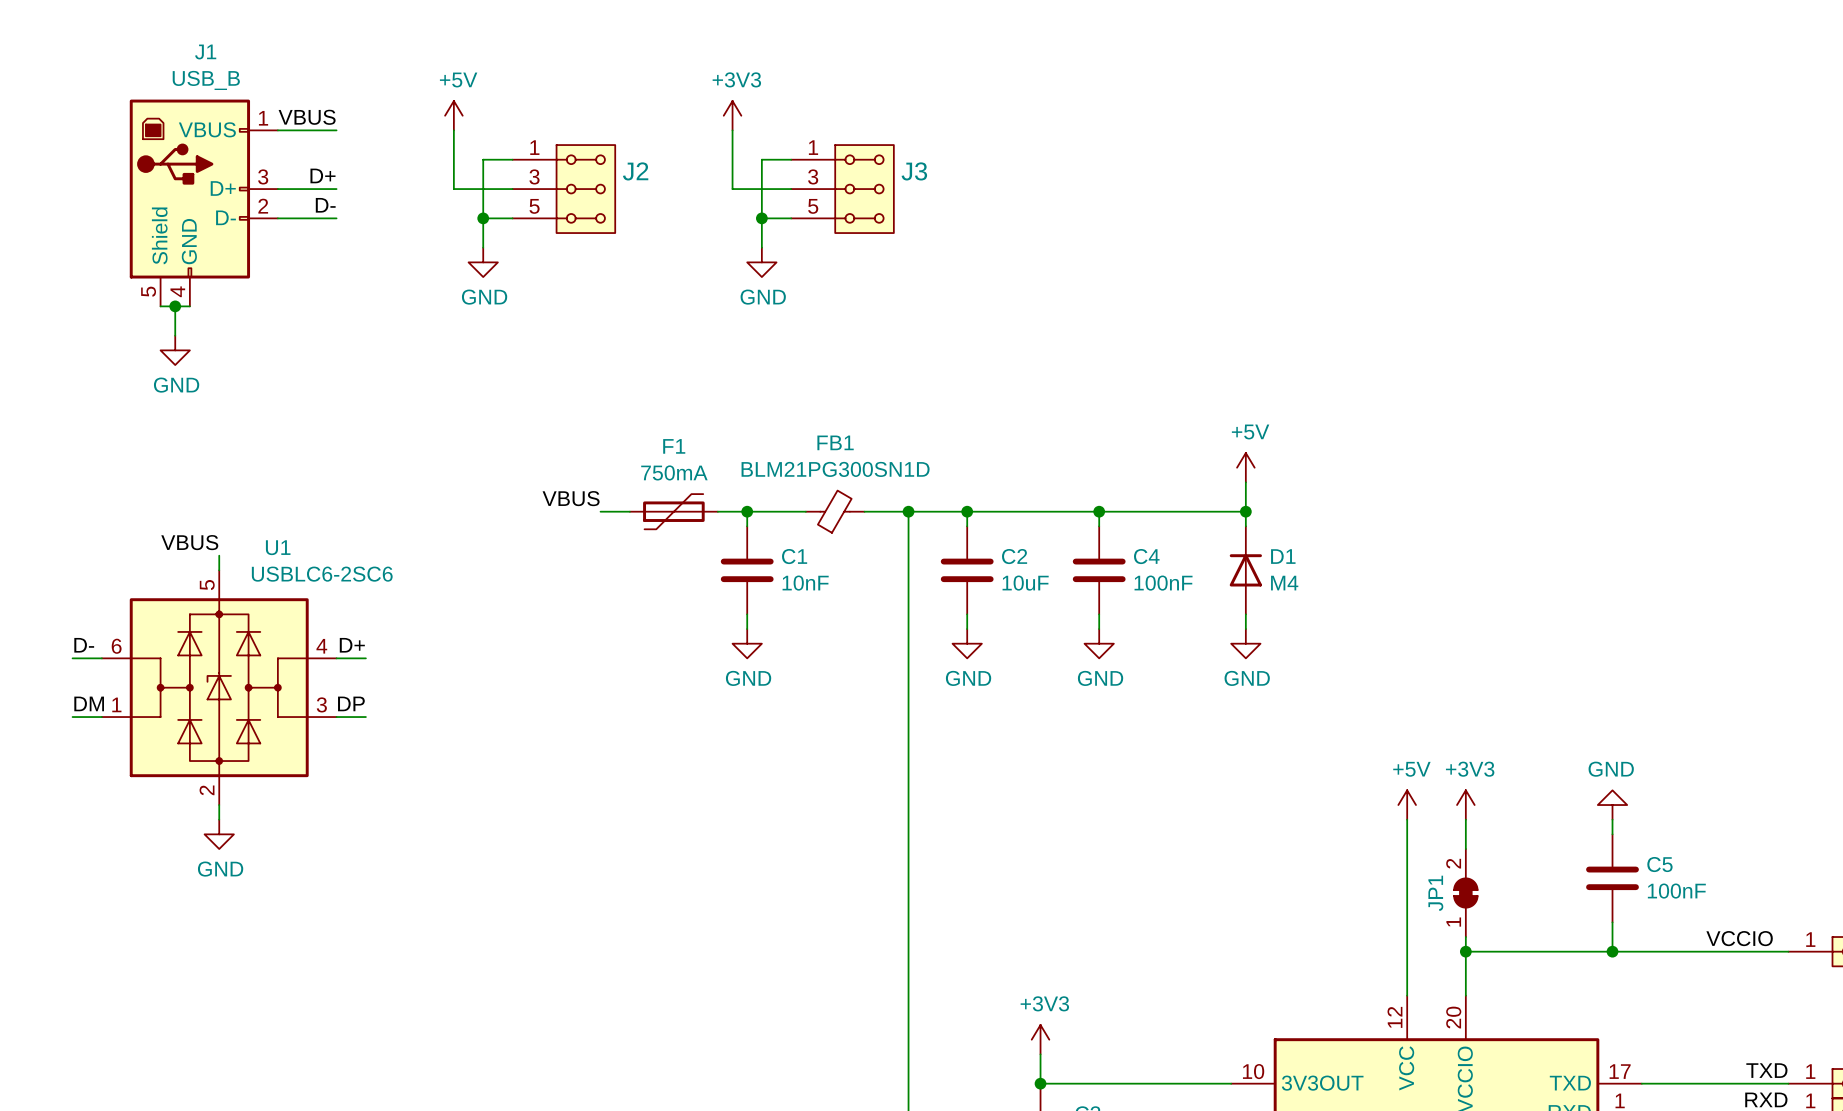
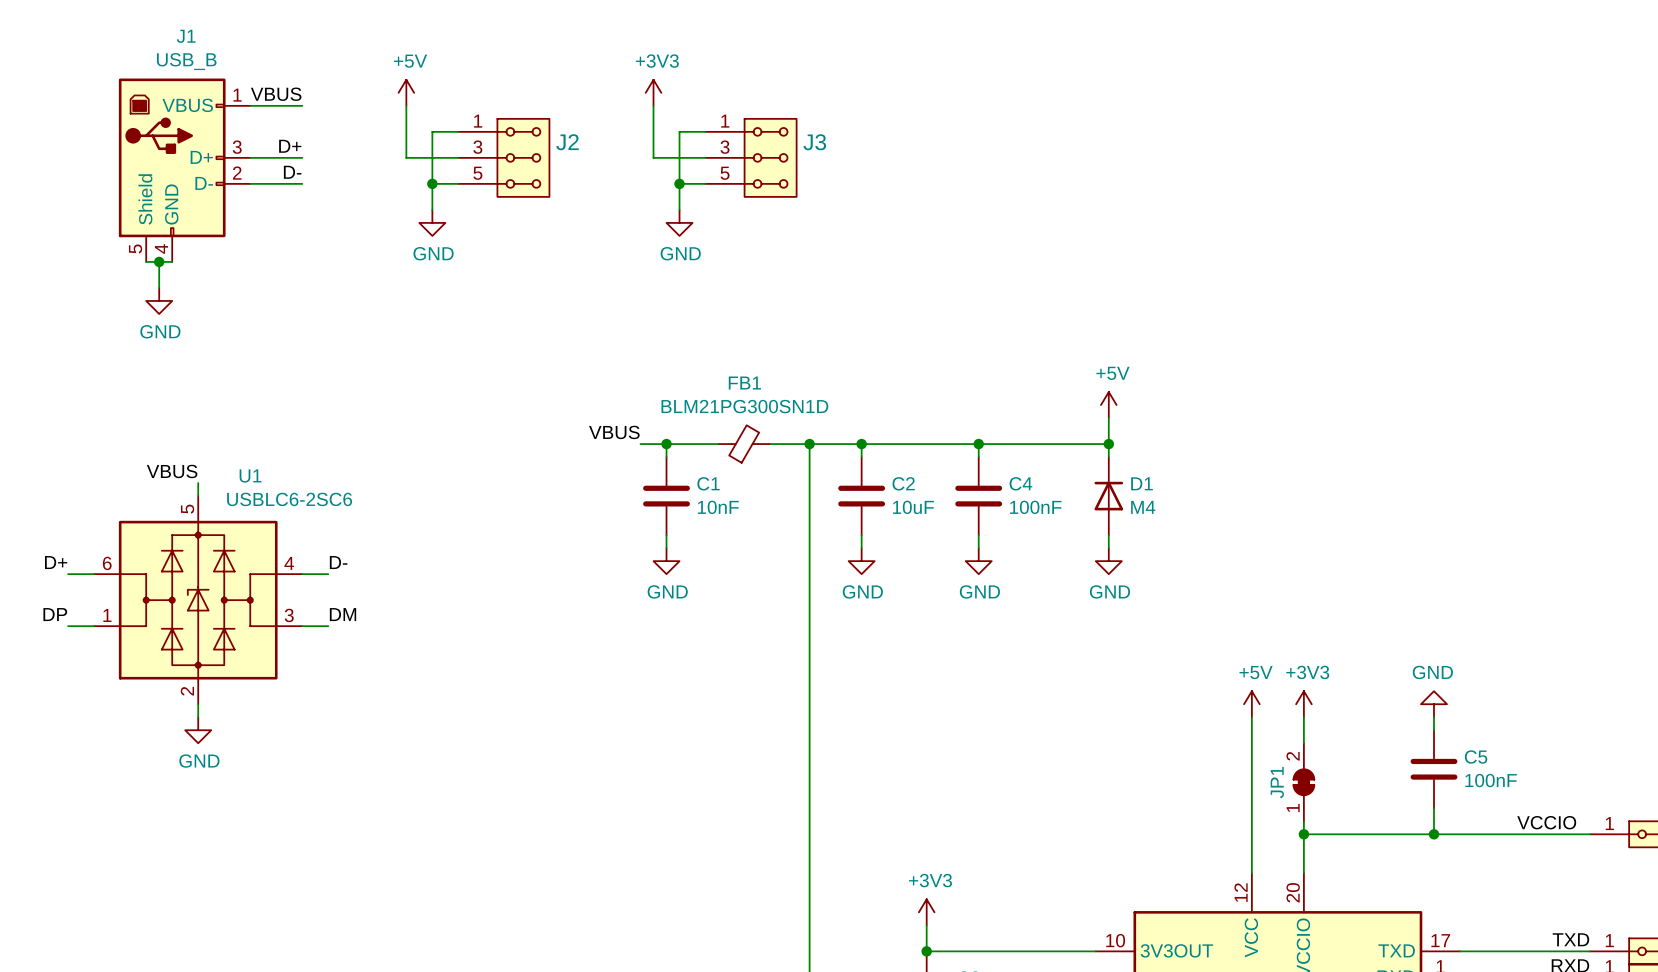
label position: VBUS (571, 498) -> VBUS (614, 432)
wire: (600, 511) (629, 511) -> none
F1: 750mA (673, 511) -> none
label: D- (84, 645) -> D+ (56, 562)
label: D+ (352, 645) -> D- (338, 562)
label: DM (89, 703) -> DP (55, 614)
label: DP (351, 703) -> DM (343, 614)

